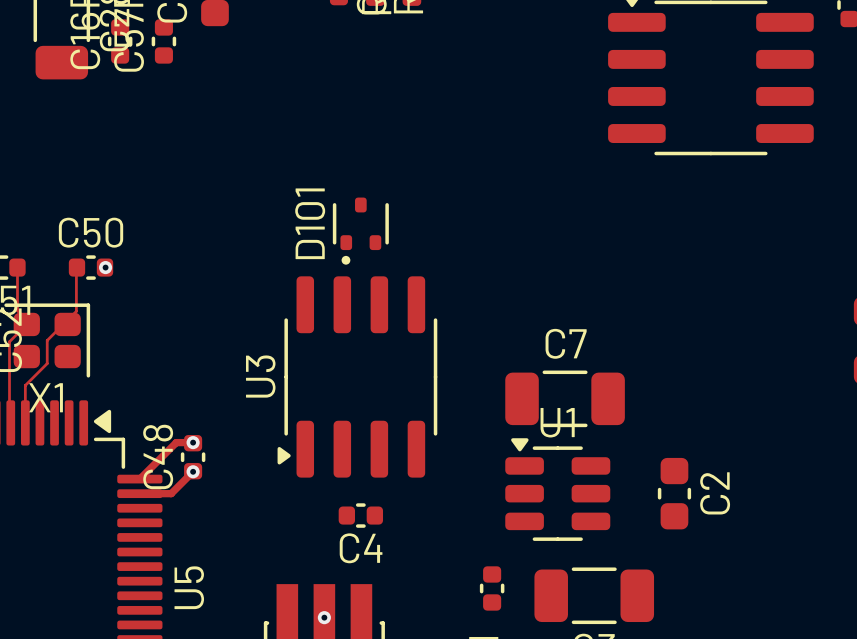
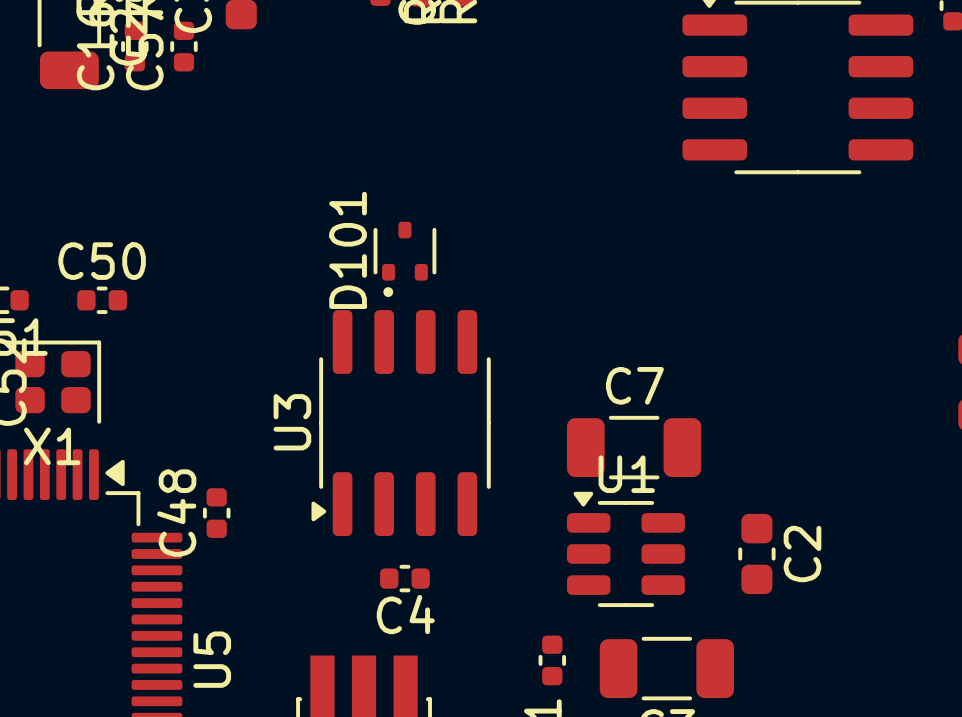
track: (17, 267) (17, 310) (32, 325) -> none
track: (76, 267) (76, 311) (47, 340) (47, 363) (25, 385) (25, 422) -> none
via: (105, 267) -> none
track: (26, 324) (9, 341) (10, 406) -> none
track: (193, 442) (176, 442) (139, 479) -> none
via: (193, 442) -> none
track: (193, 471) (171, 493) (139, 493) -> none
via: (193, 471) -> none
via: (324, 617) -> none

